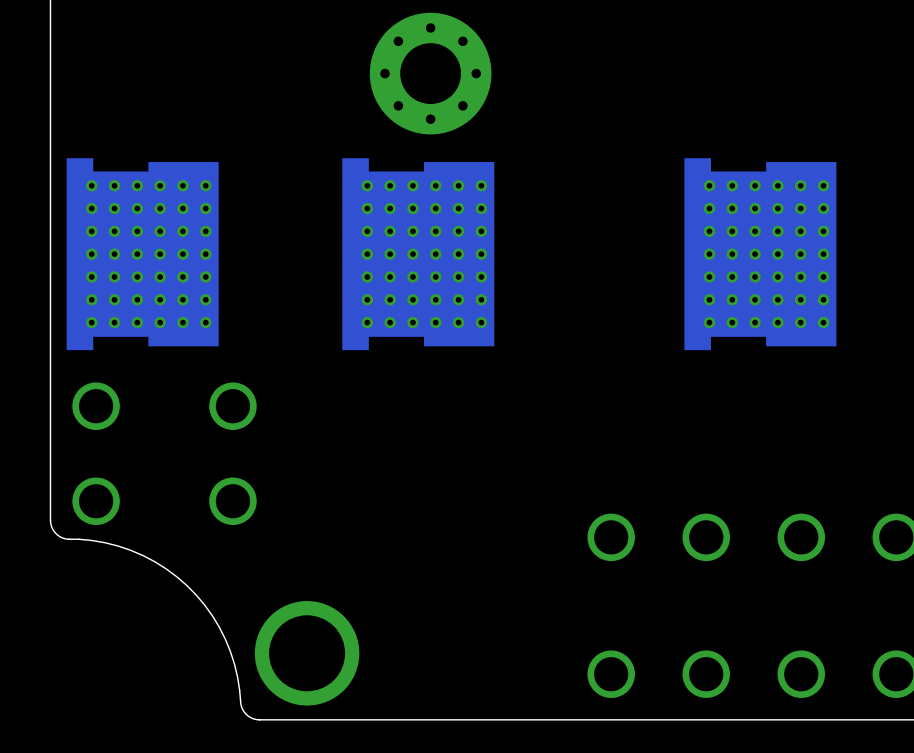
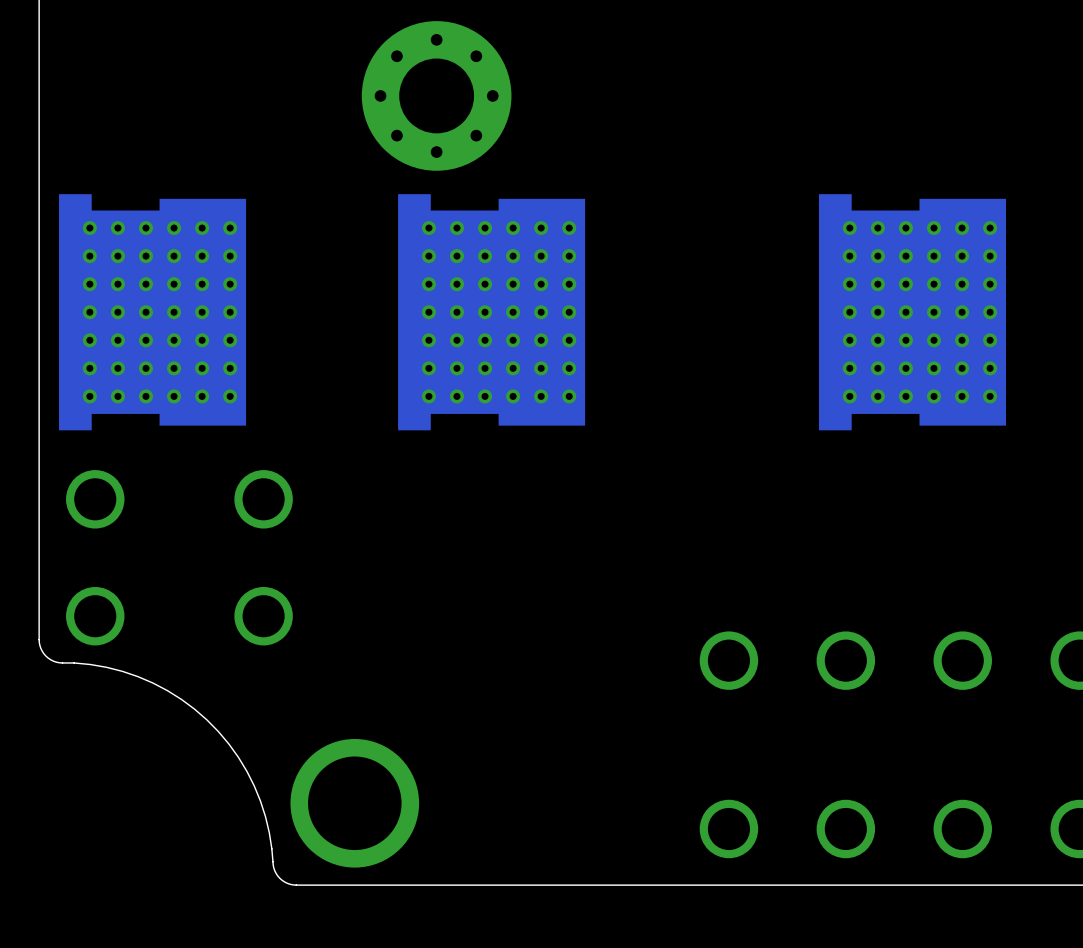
part position: (430, 73) -> (436, 95)

